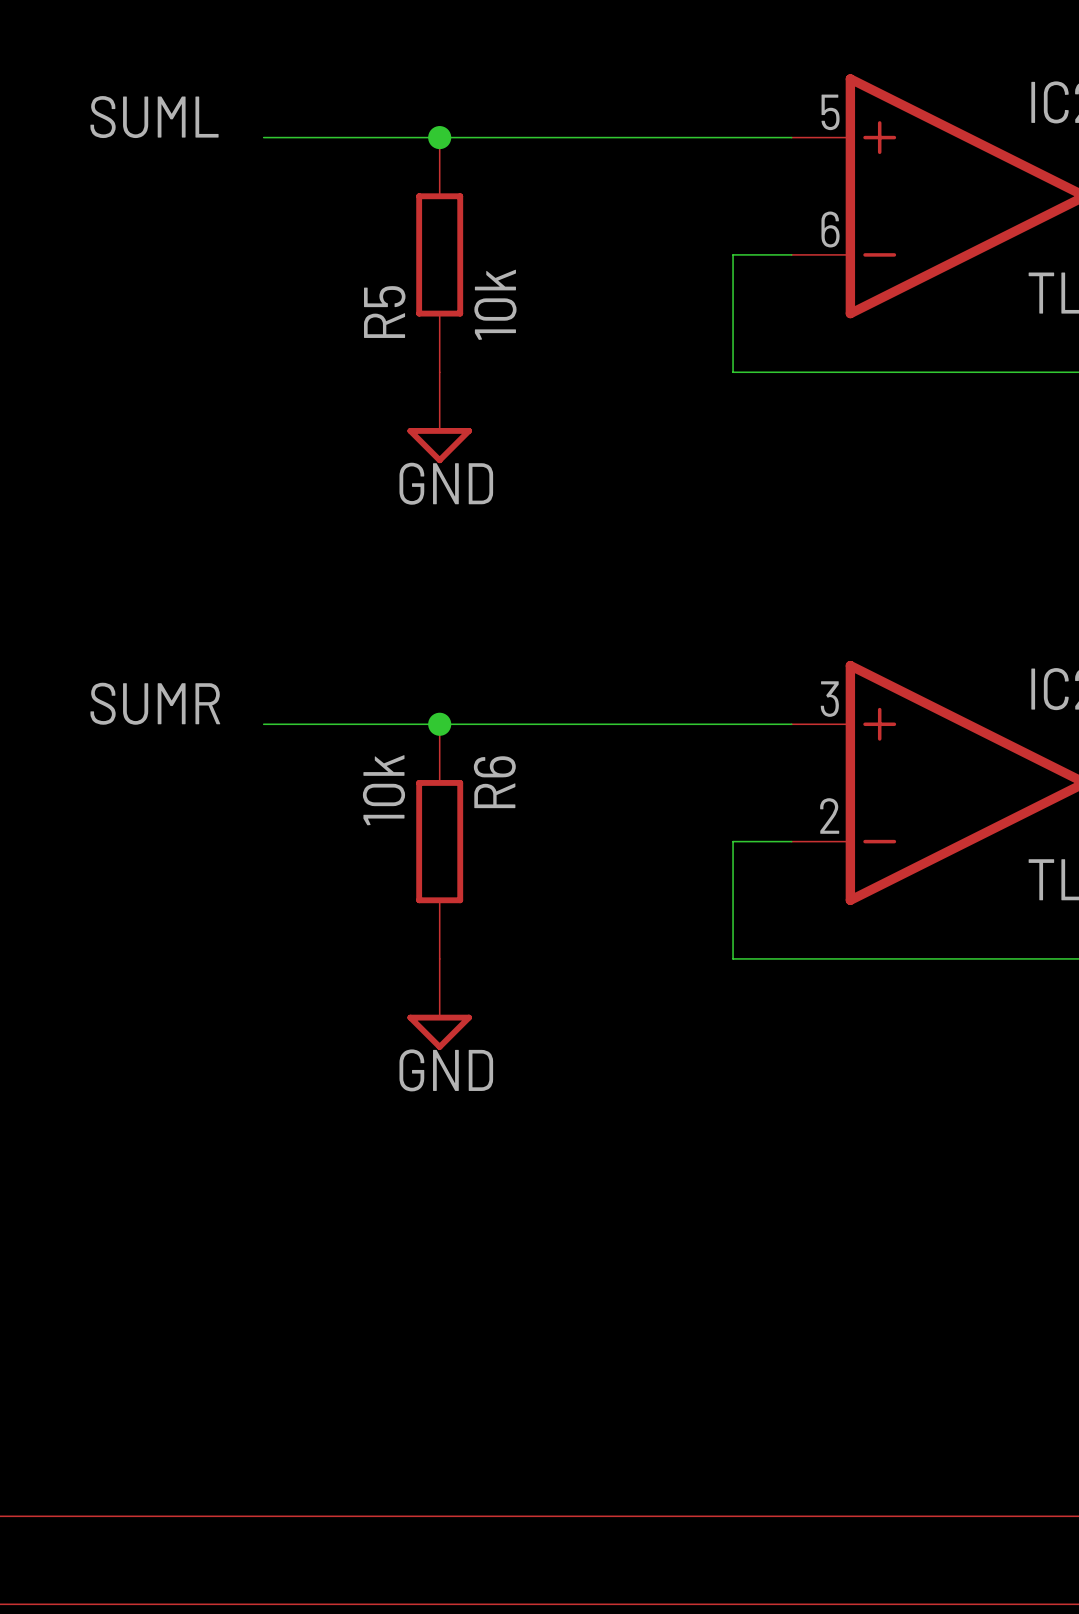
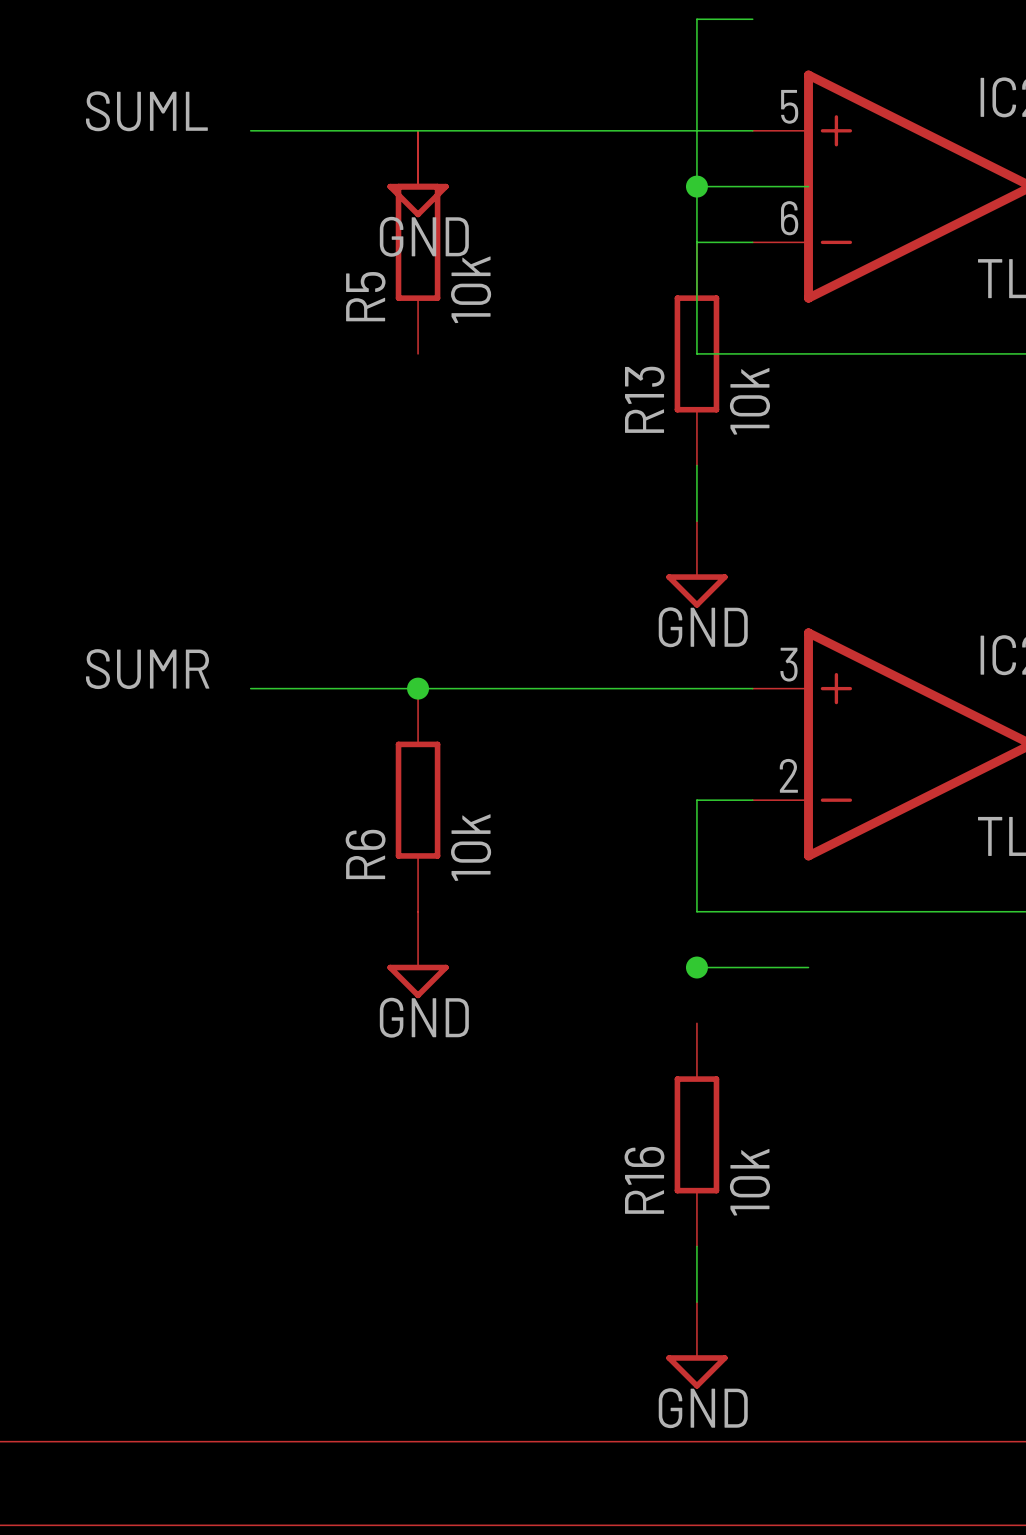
wire: none -> (752, 19) (696, 19) (696, 242)
junction: (439, 137) -> none
power symbol: none -> GND (418, 174)
wire: none -> (696, 186) (808, 186)
junction: none -> (696, 186)
R13: none -> 10k (696, 353)
power symbol: GND (439, 417) -> none
wire: none -> (696, 465) (696, 521)
power symbol: none -> GND (696, 564)
R6 name position: R6 (494, 782) -> R6 (365, 854)
R6 value position: 10k (383, 790) -> 10k (471, 847)
wire: none -> (696, 967) (808, 967)
junction: none -> (696, 967)
R16: none -> 10k (696, 1134)
wire: none -> (696, 1246) (696, 1302)
power symbol: none -> GND (696, 1345)

